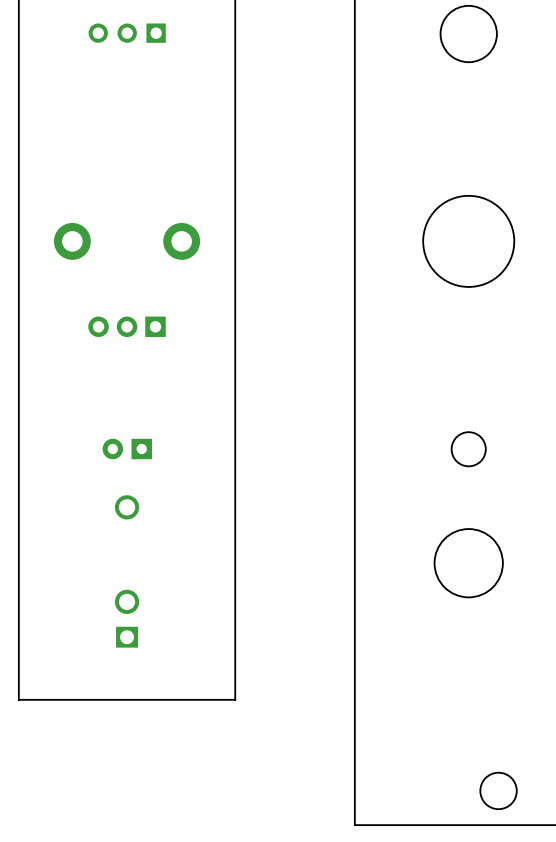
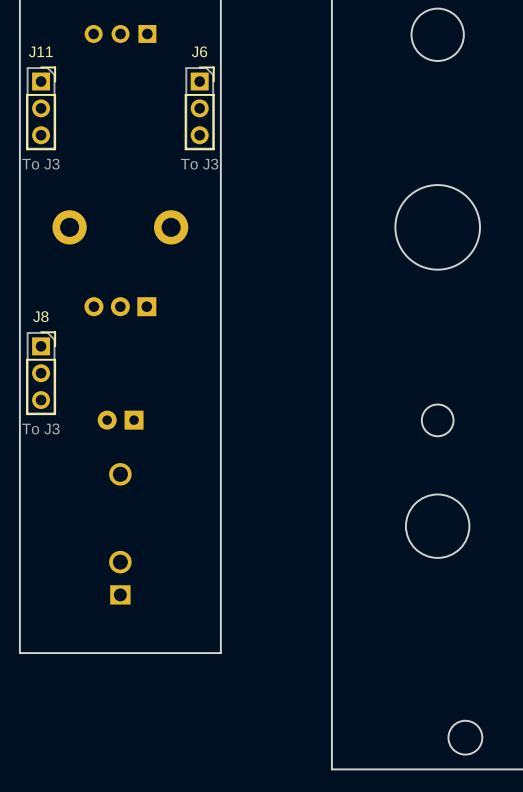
J11: none -> To J3 (41, 108)
J6: none -> To J3 (199, 108)
J8: none -> To J3 (41, 373)

